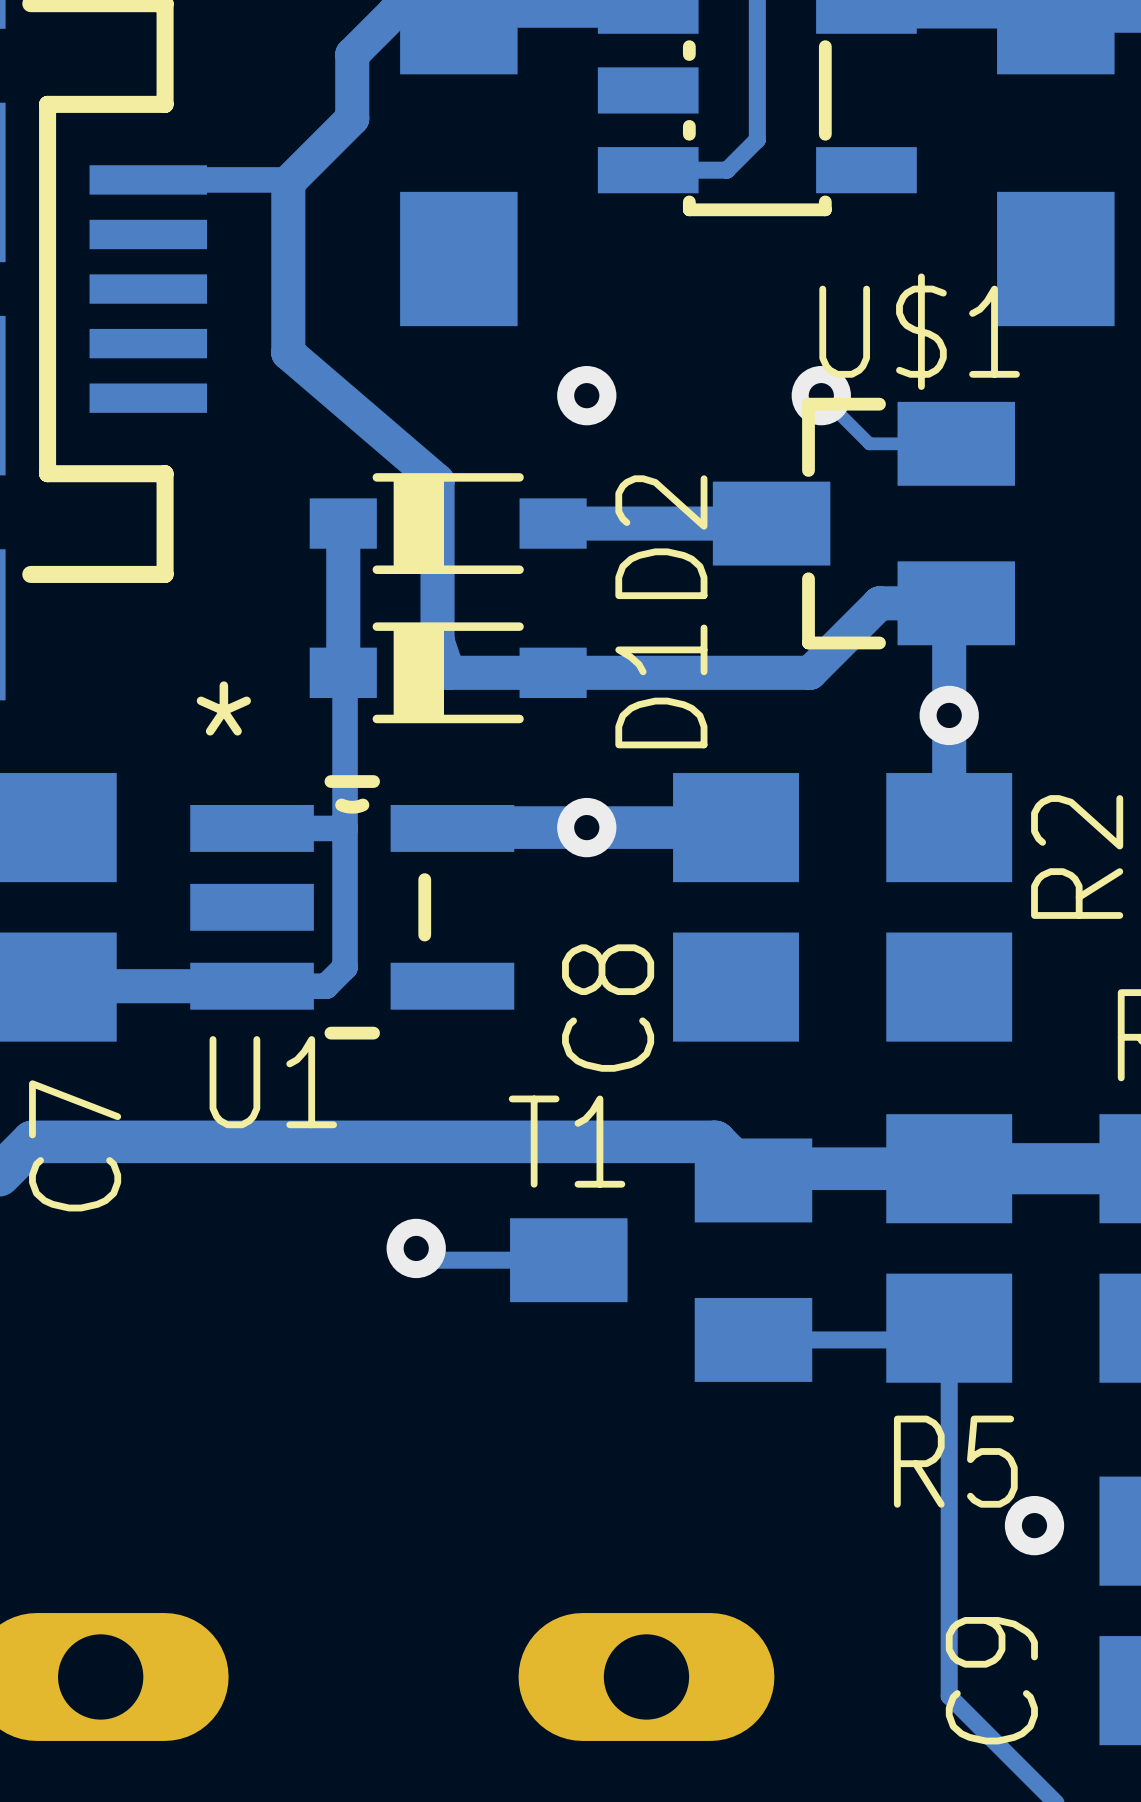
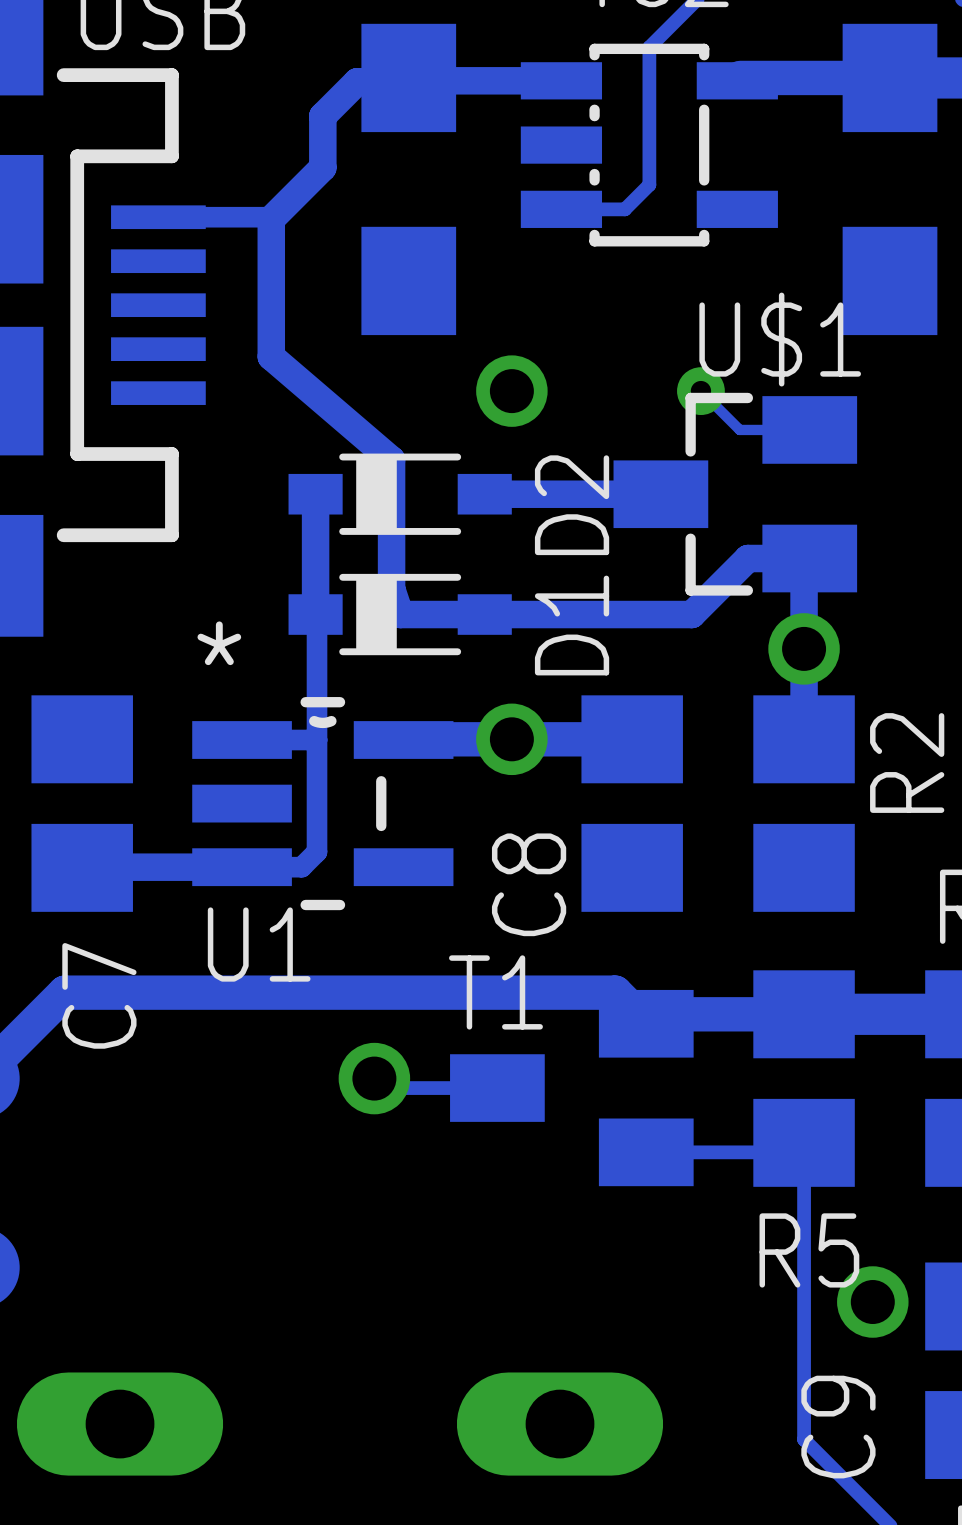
via size: [557, 366, 617, 426] -> [476, 355, 548, 427]
via size: [919, 685, 979, 746] -> [768, 613, 840, 685]
via size: [557, 797, 617, 858] -> [476, 703, 548, 776]
via size: [386, 1218, 446, 1279] -> [338, 1042, 411, 1115]
via size: [1004, 1495, 1065, 1556] -> [837, 1266, 909, 1338]

